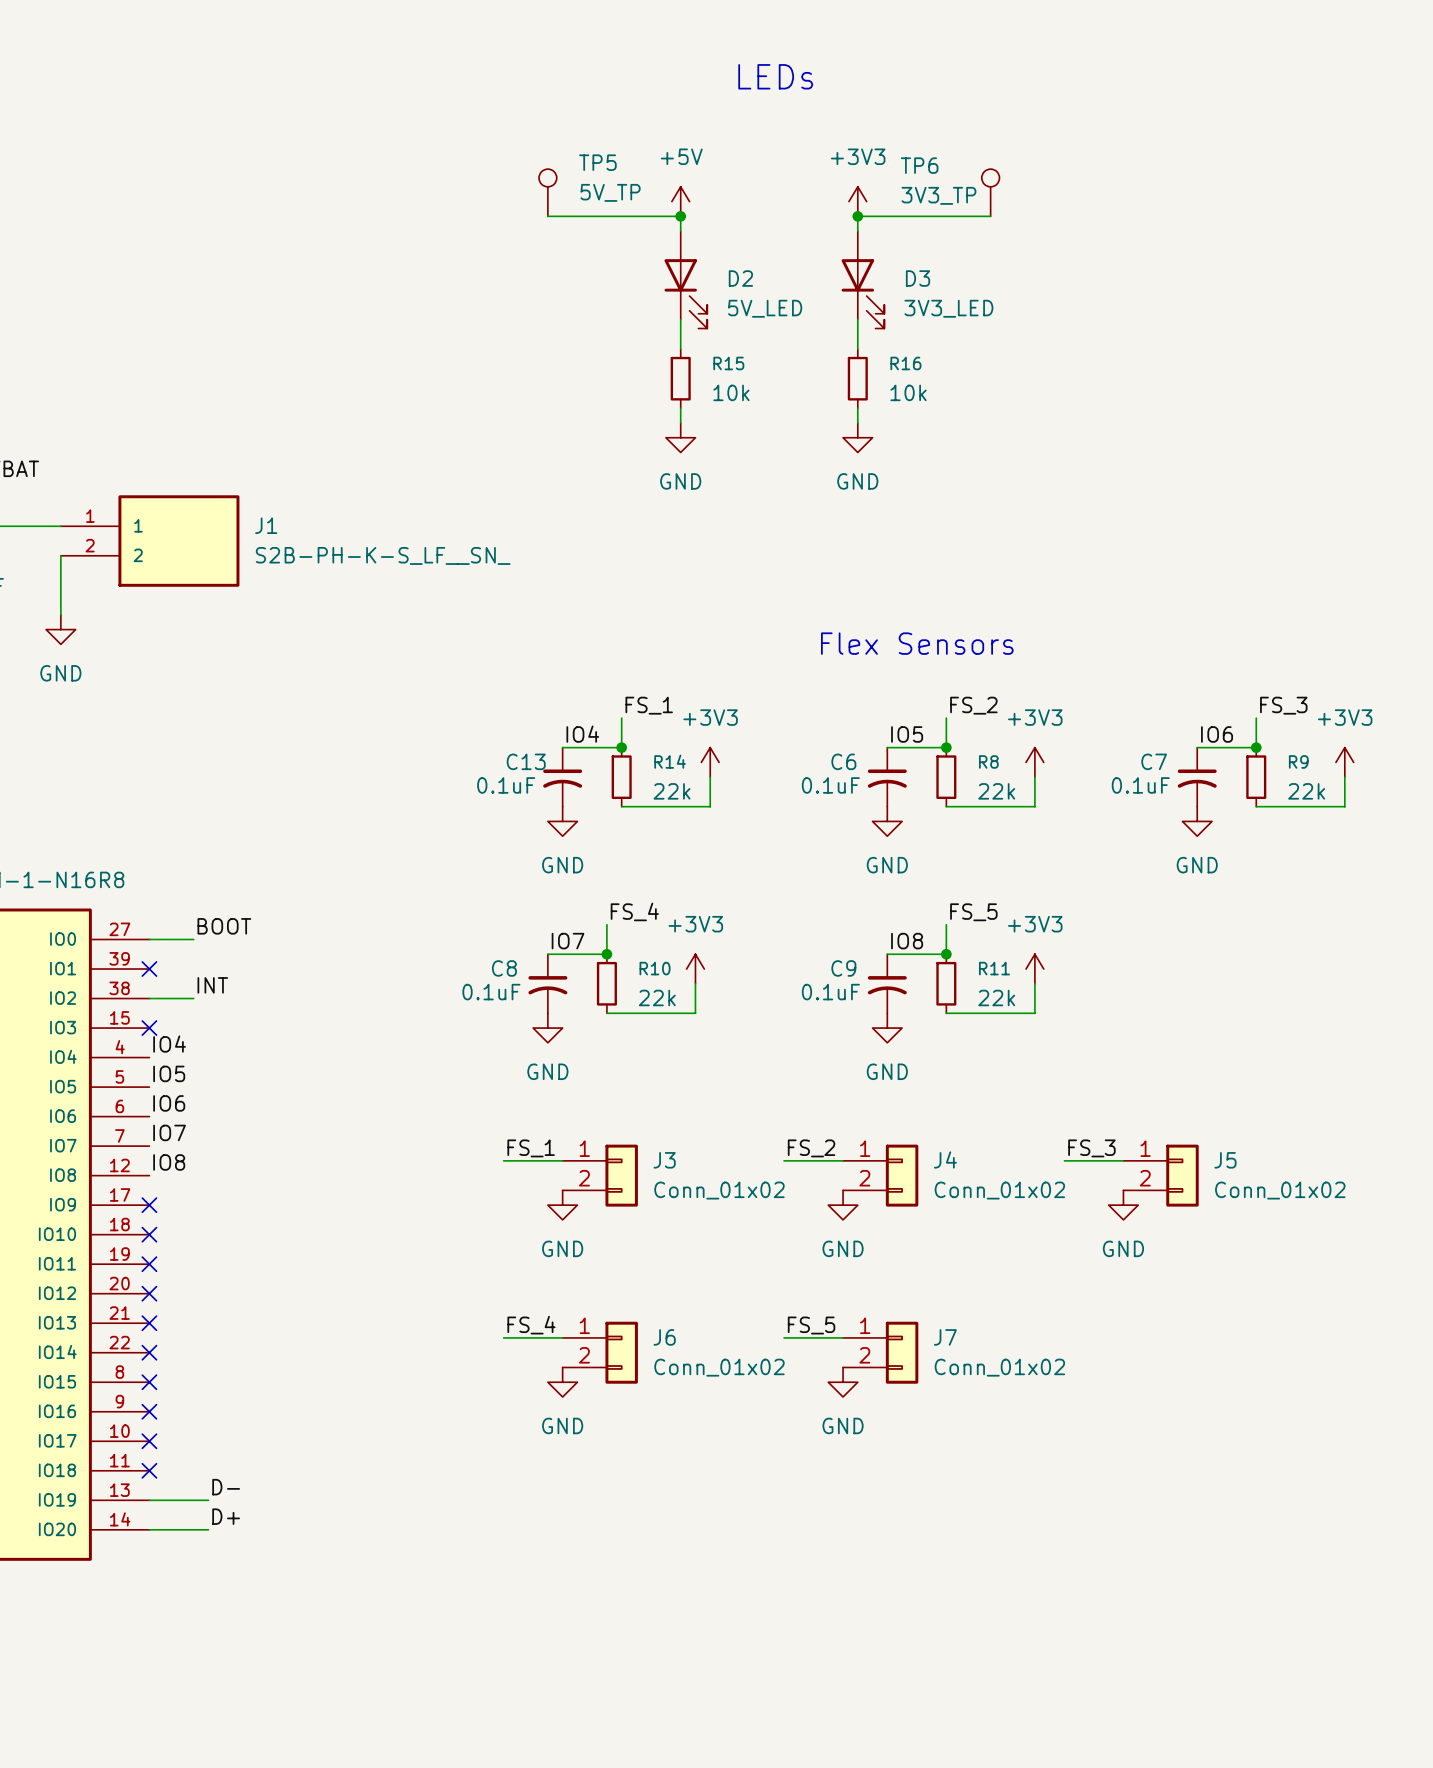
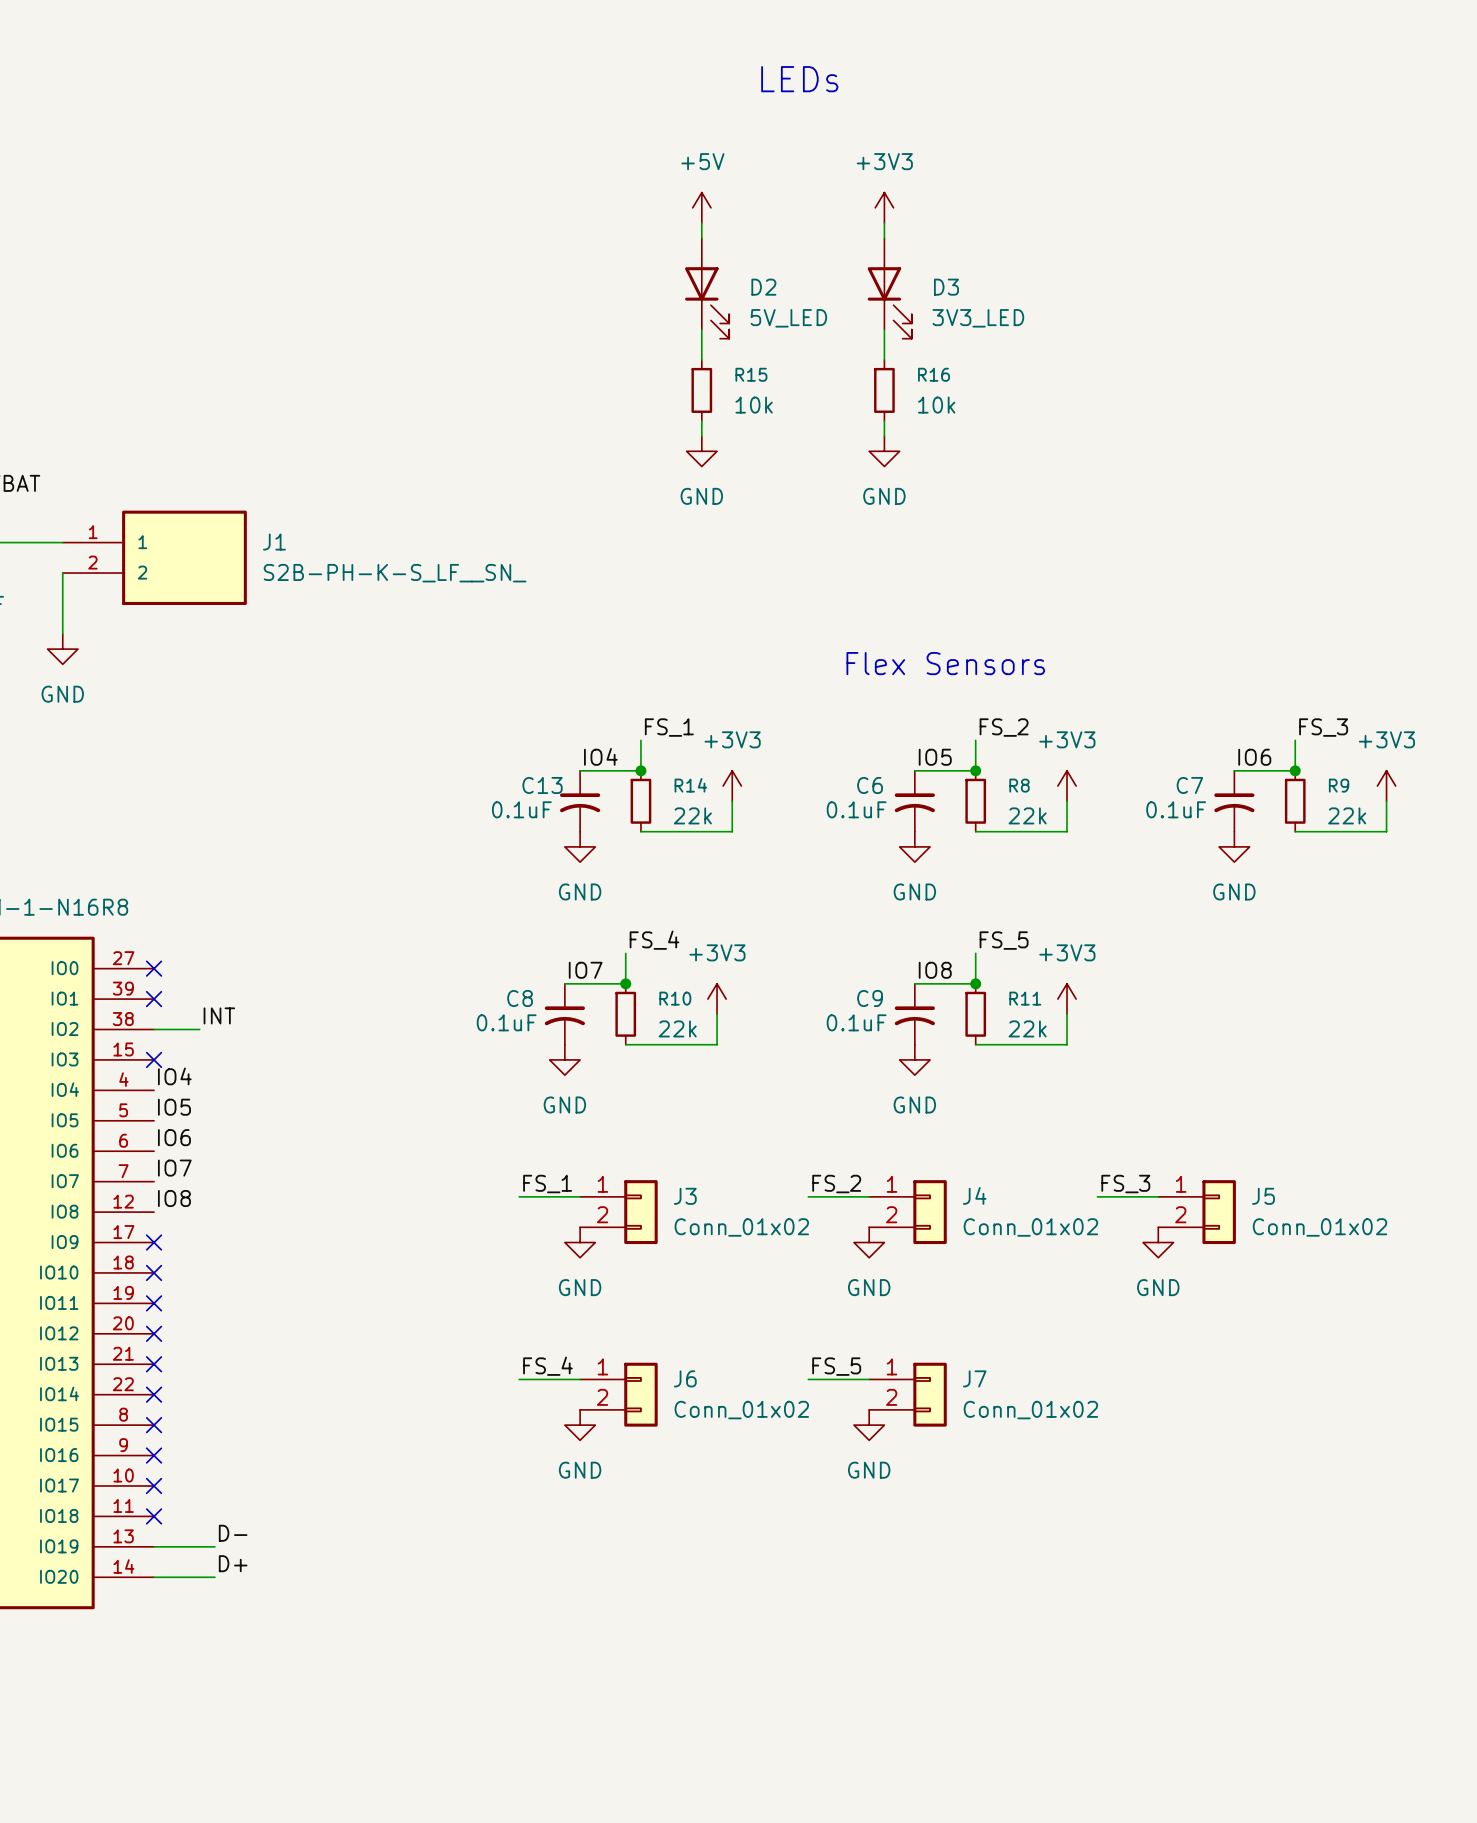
TP5: 5V_TP (547, 192) -> none
TP6: 3V3_TP (990, 192) -> none
wire: (547, 216) (680, 216) -> none
junction: (680, 216) -> none
wire: (857, 216) (990, 216) -> none
junction: (857, 216) -> none
label: BOOT (224, 926) -> none
wire: (149, 939) (193, 939) -> none
no-connect mark: none -> (154, 968)

